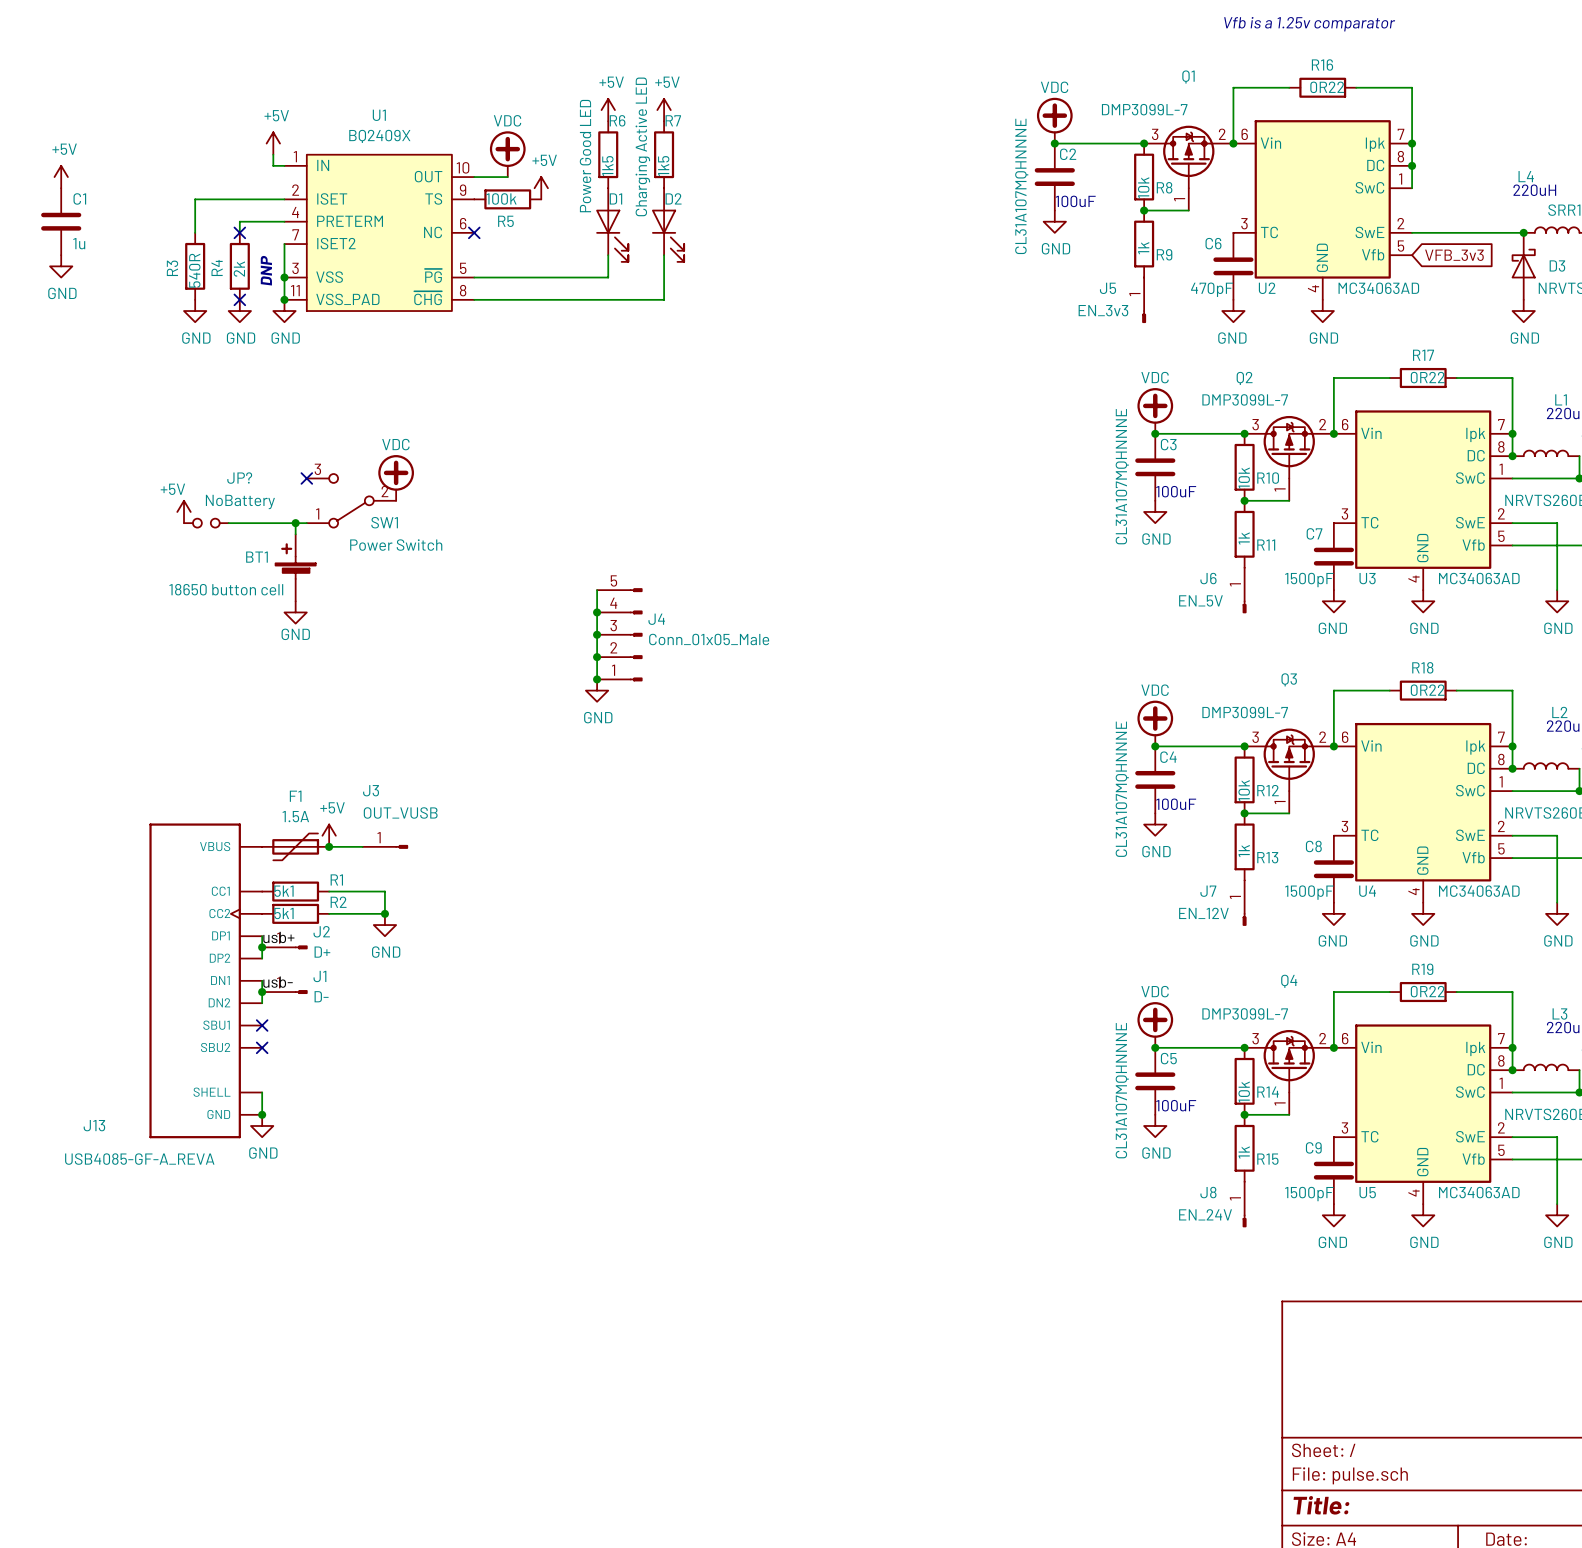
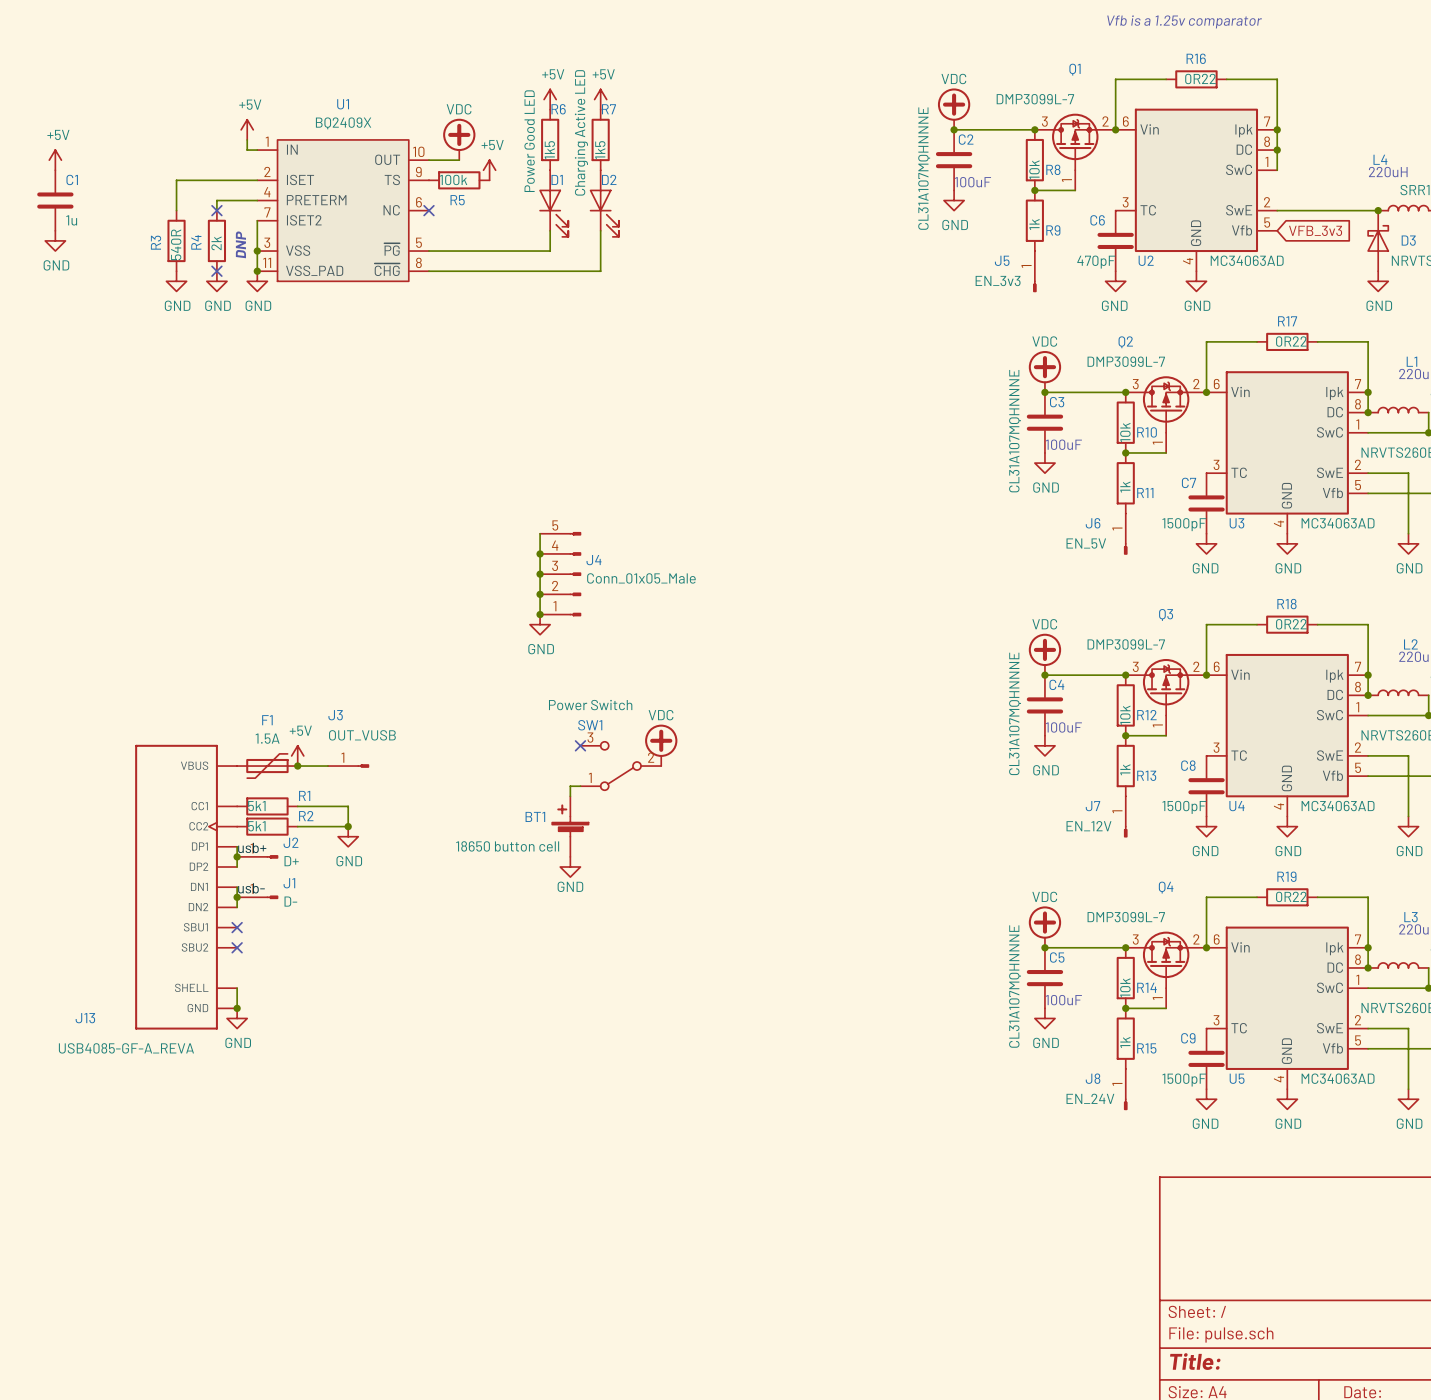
power symbol: VDC (396, 477) -> none
no-connect mark: (306, 478) -> none
SW1 position: (351, 500) -> (620, 766)
power symbol: +5V (184, 511) -> none
SW1 name position: SW1 (384, 522) -> SW1 (590, 725)
JP?: NoBattery (206, 523) -> none
wire: (228, 523) (306, 523) -> none
wire: (295, 523) (295, 534) -> none
junction: (295, 523) -> none
SW1 value position: Power Switch (396, 545) -> Power Switch (590, 705)
BT1 position: (295, 567) -> (570, 826)
power symbol: GND (295, 612) -> none
no-connect mark: none -> (580, 745)
power symbol: none -> VDC (661, 745)
wire: none -> (580, 786) (570, 786) (570, 796)
power symbol: none -> GND (570, 867)

